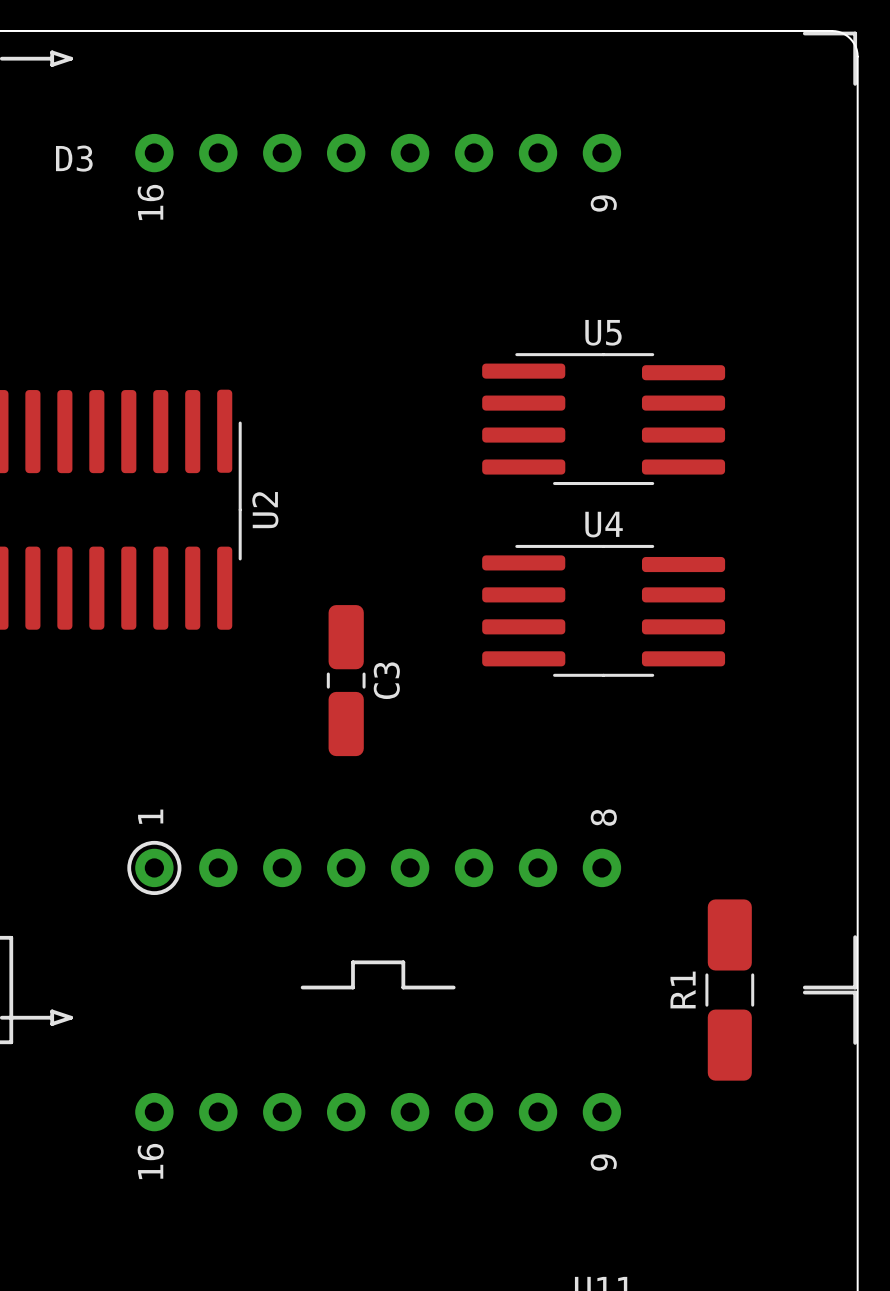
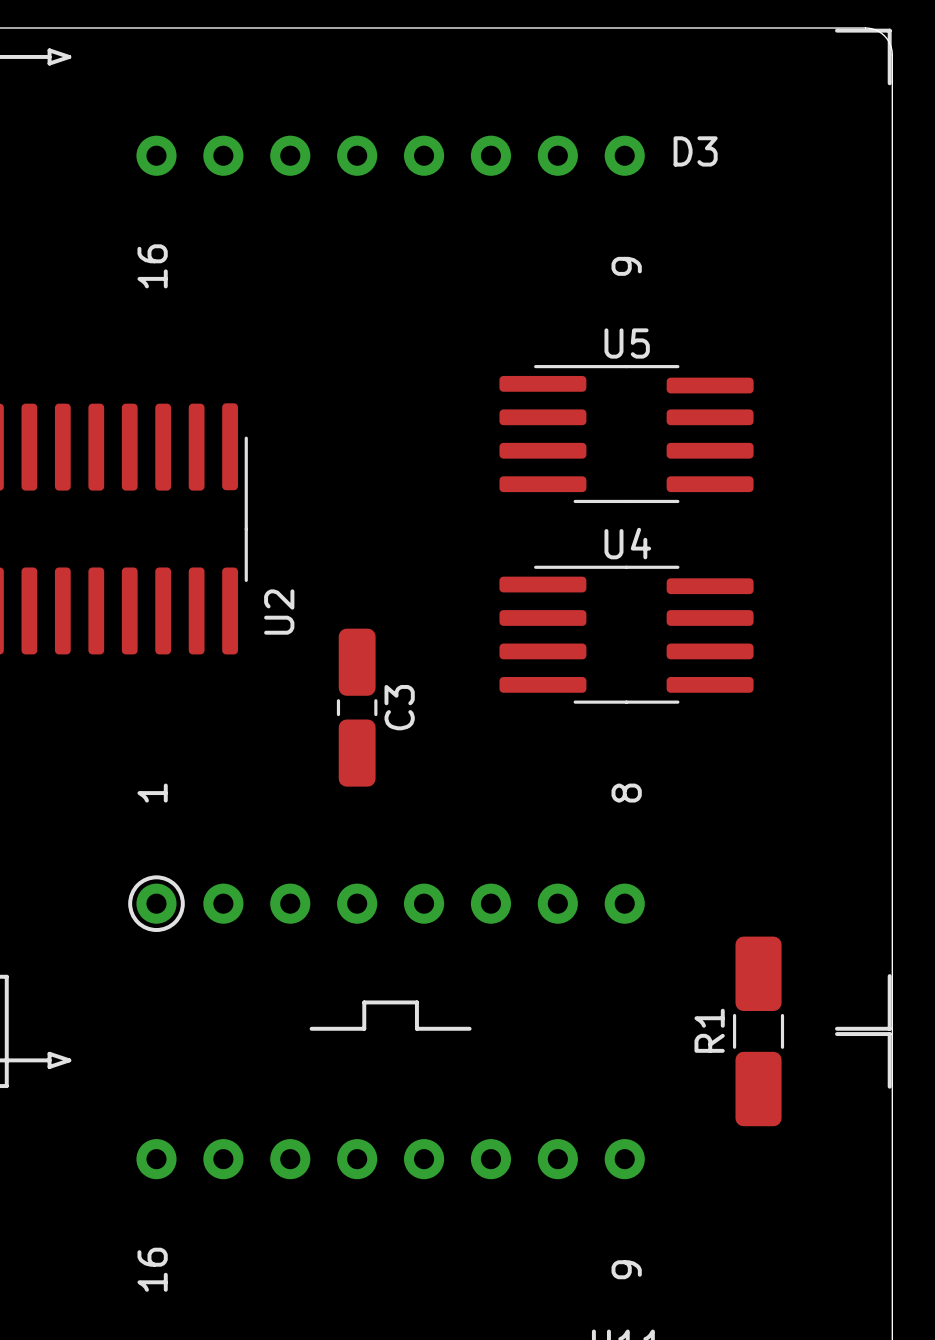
D3 name position: D3 (74, 158) -> D3 (695, 151)
D3 text position: 16 (150, 202) -> 16 (152, 266)
D3 text position: 9 (603, 203) -> 9 (626, 266)
U2 name position: U2 (265, 510) -> U2 (279, 612)
D3 text position: 1 (150, 816) -> 1 (152, 793)
D3 text position: 8 (603, 817) -> 8 (626, 793)
part text position: 16 (150, 1161) -> 16 (152, 1269)
part text position: 9 (603, 1162) -> 9 (626, 1269)

